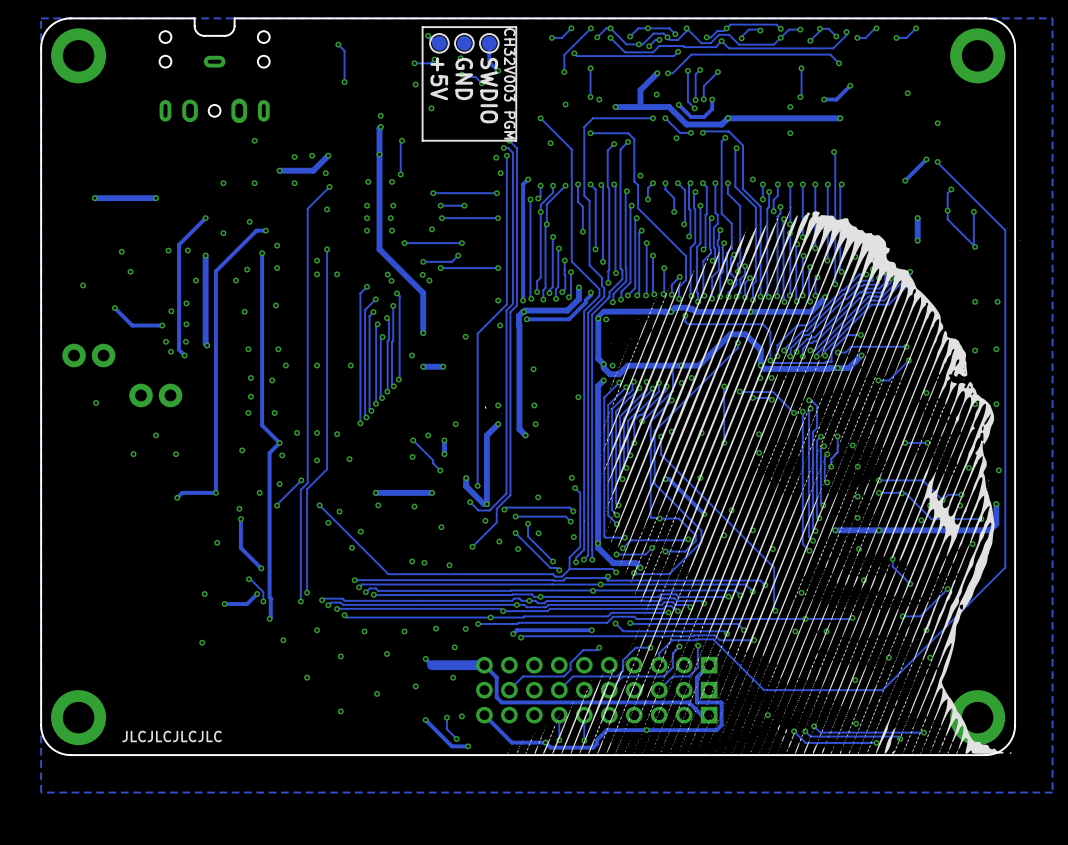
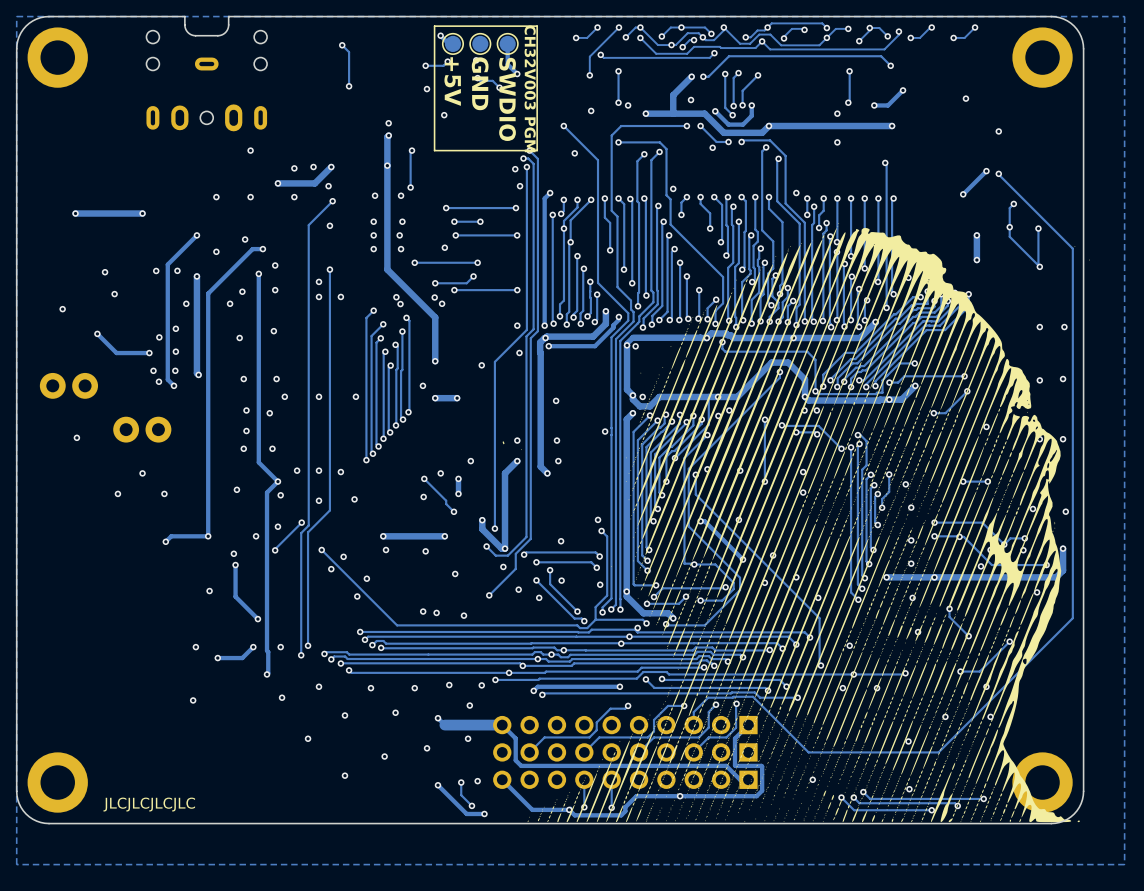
track: (248, 579) (263, 592) (263, 601) -> none
via: (248, 579) -> none
via: none -> (280, 647)
via: (263, 601) -> none

